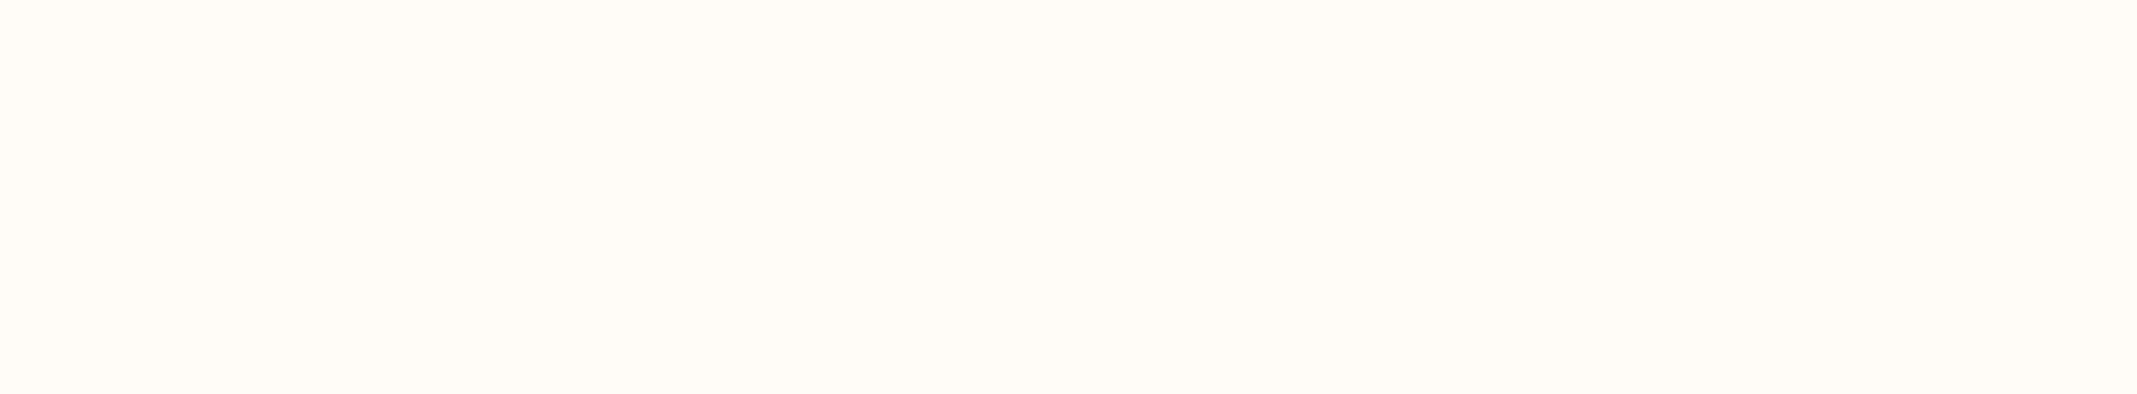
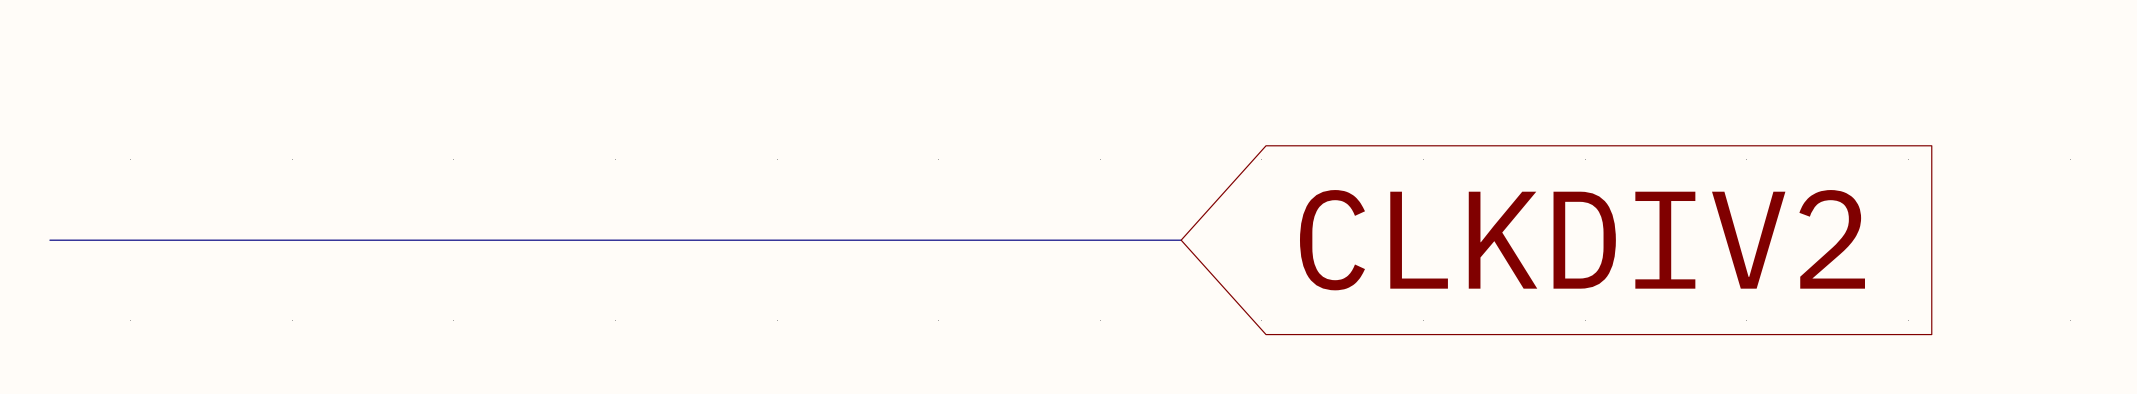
wire: none -> (49, 240) (1181, 240)
global label: none -> CLKDIV2 (1582, 240)

